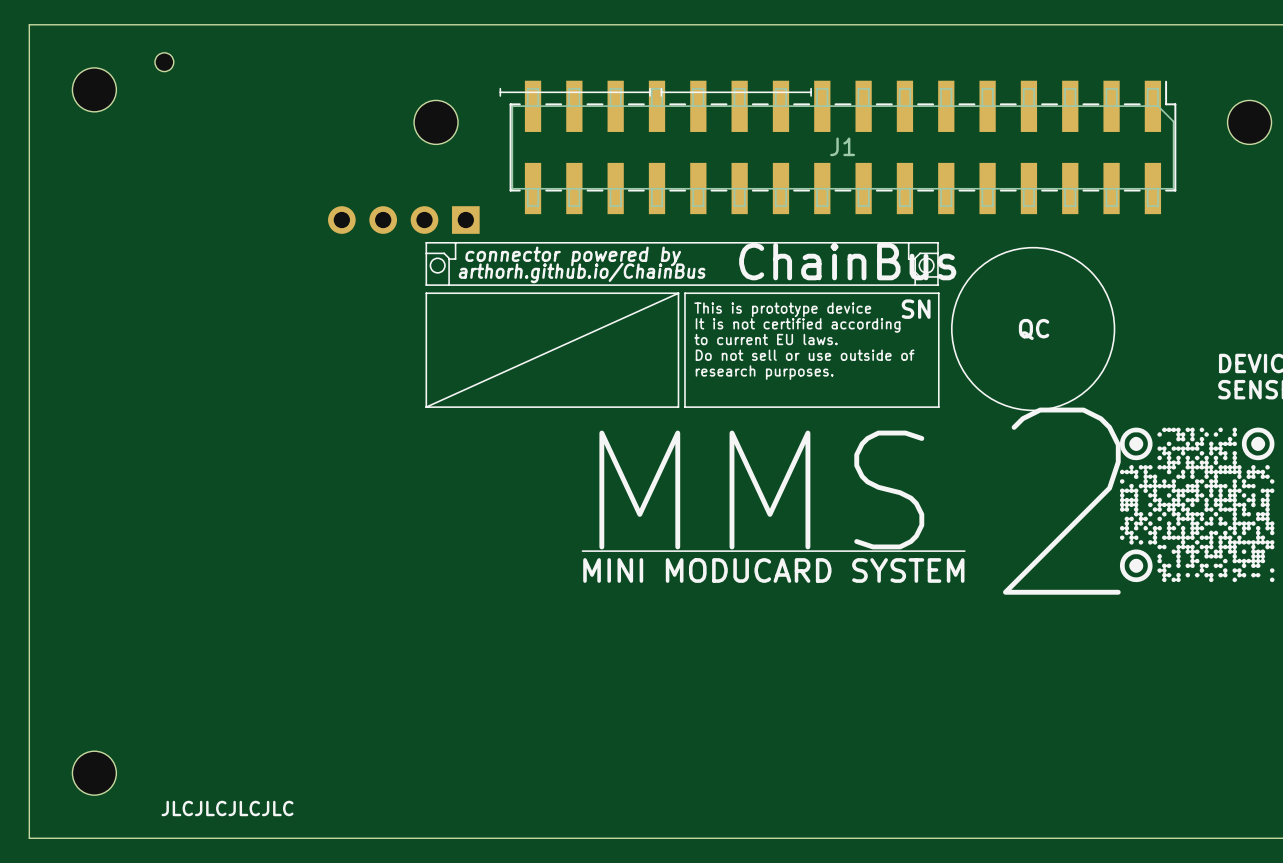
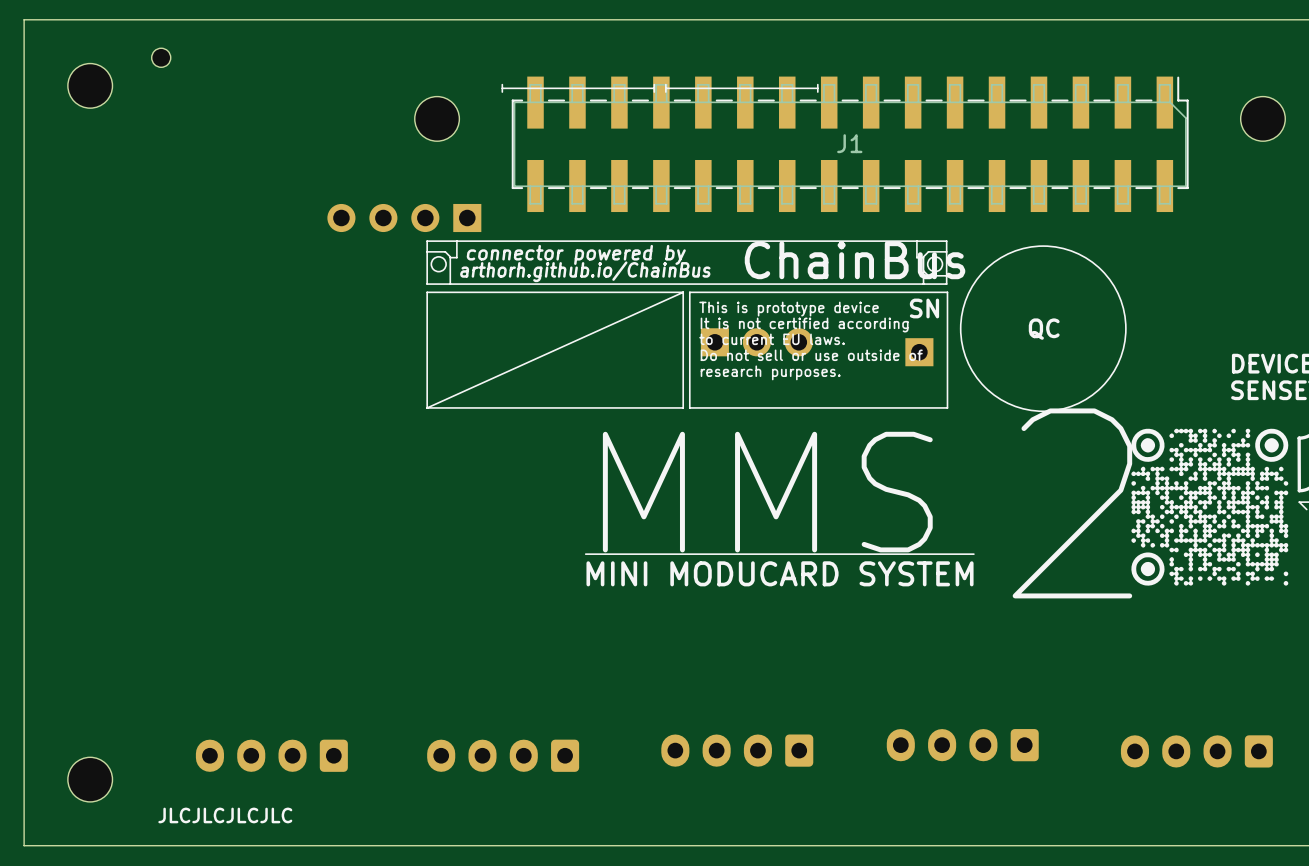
part: none -> (756, 342)
part: none -> (919, 352)
part: none -> (962, 745)
part: none -> (737, 750)
part: none -> (1196, 751)
part: none -> (271, 755)
part: none -> (503, 755)

